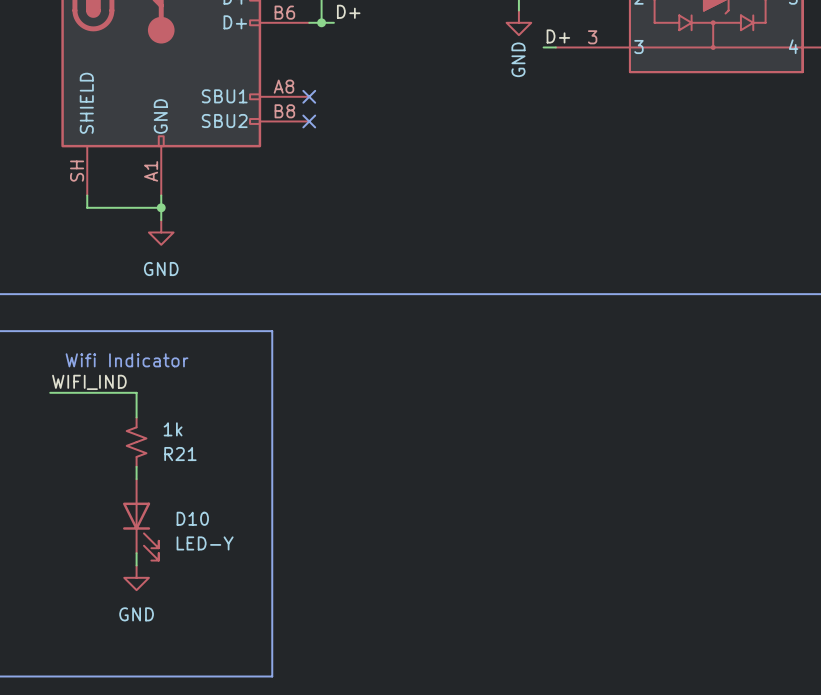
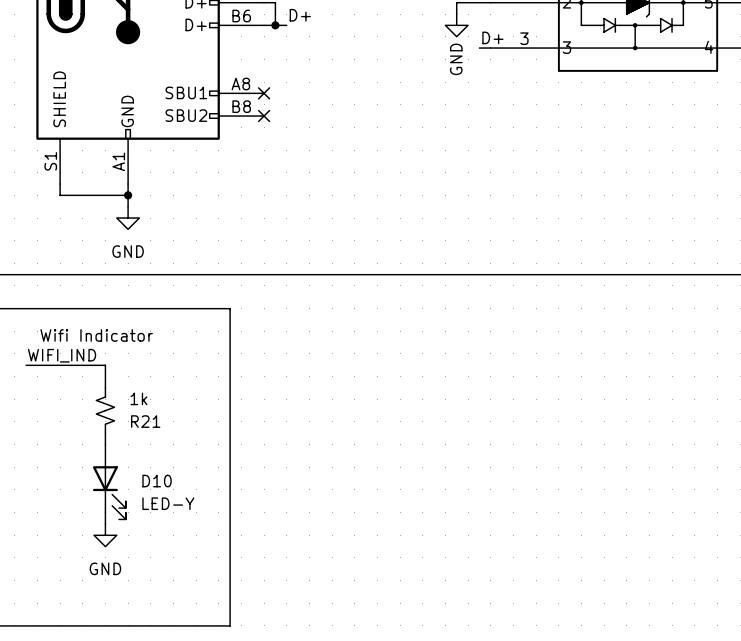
part pin number: SH (77, 171) -> S1 (50, 161)

